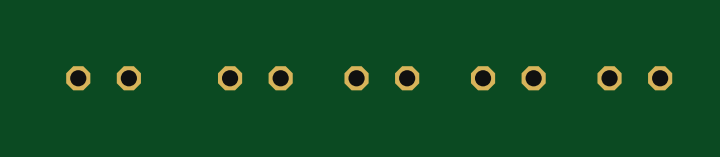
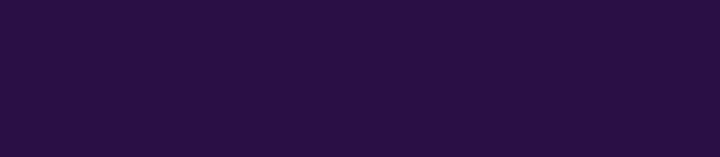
part: (103, 78) -> none
part: (255, 78) -> none
part: (381, 78) -> none
part: (508, 78) -> none
part: (634, 78) -> none

